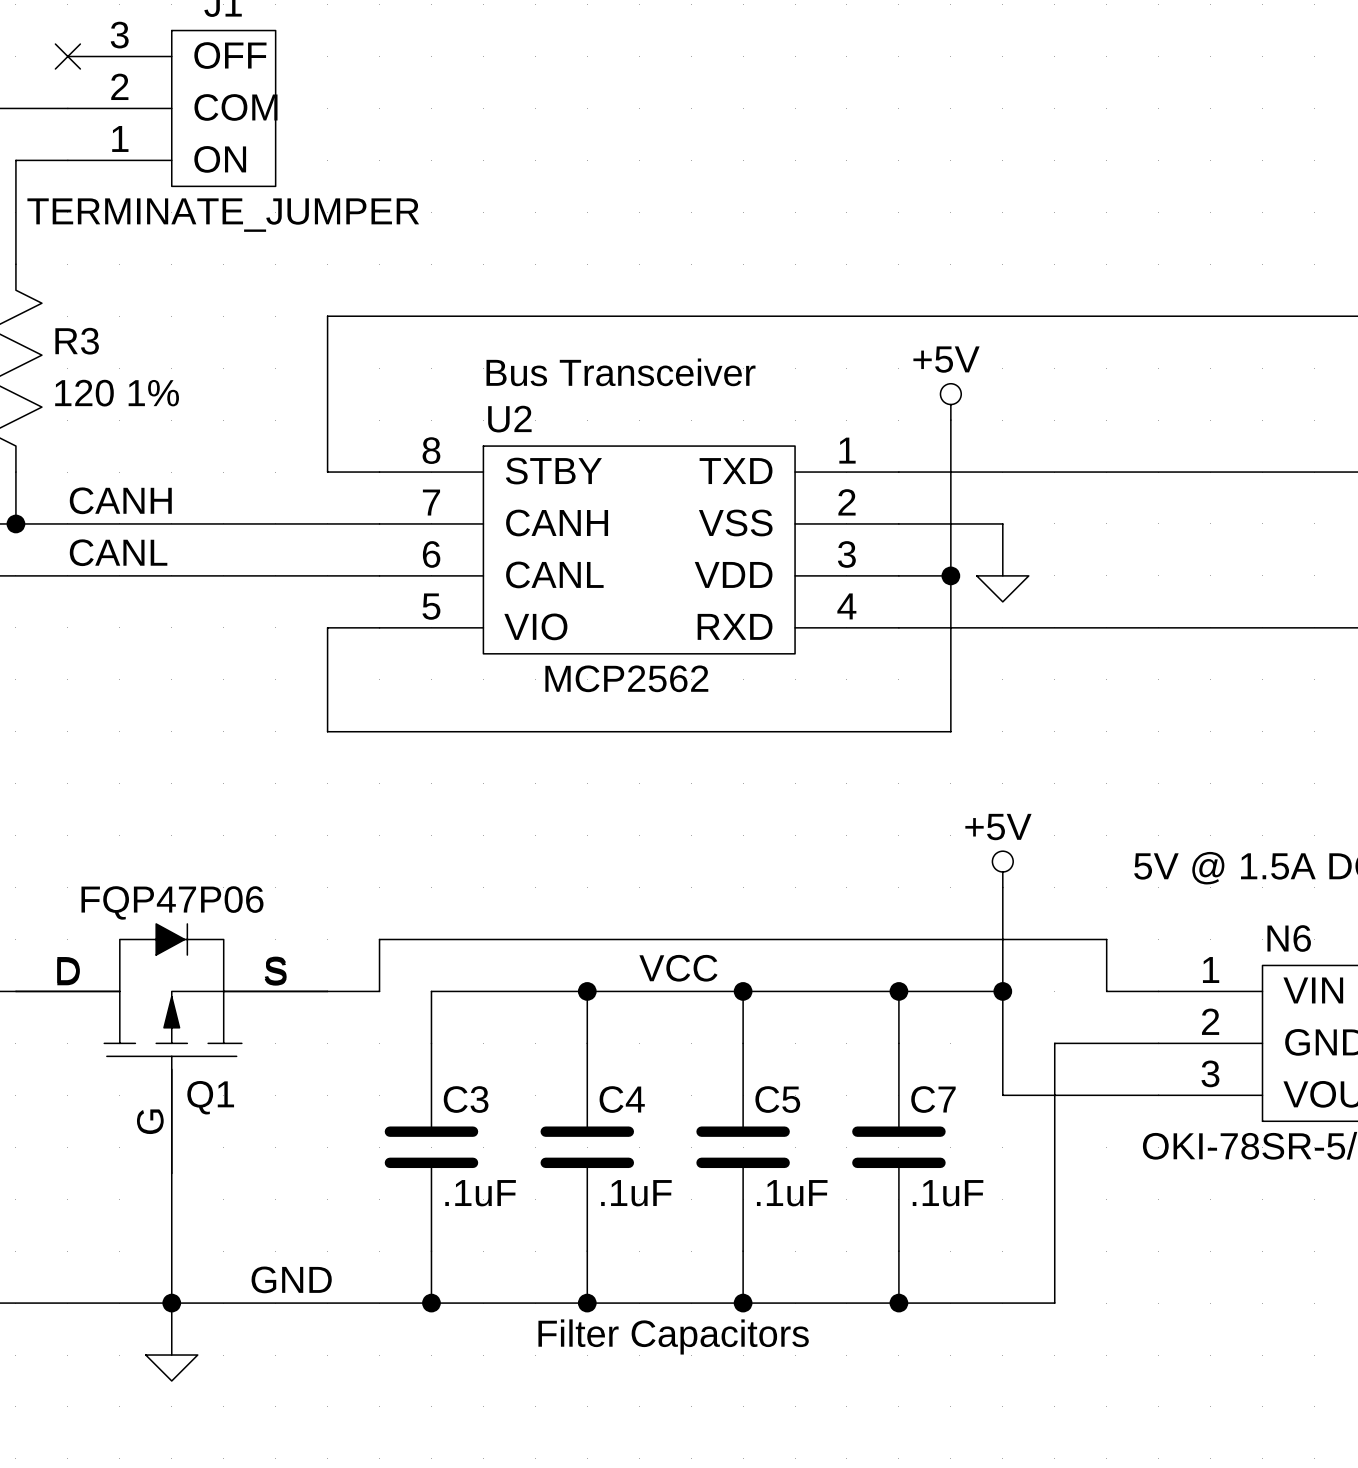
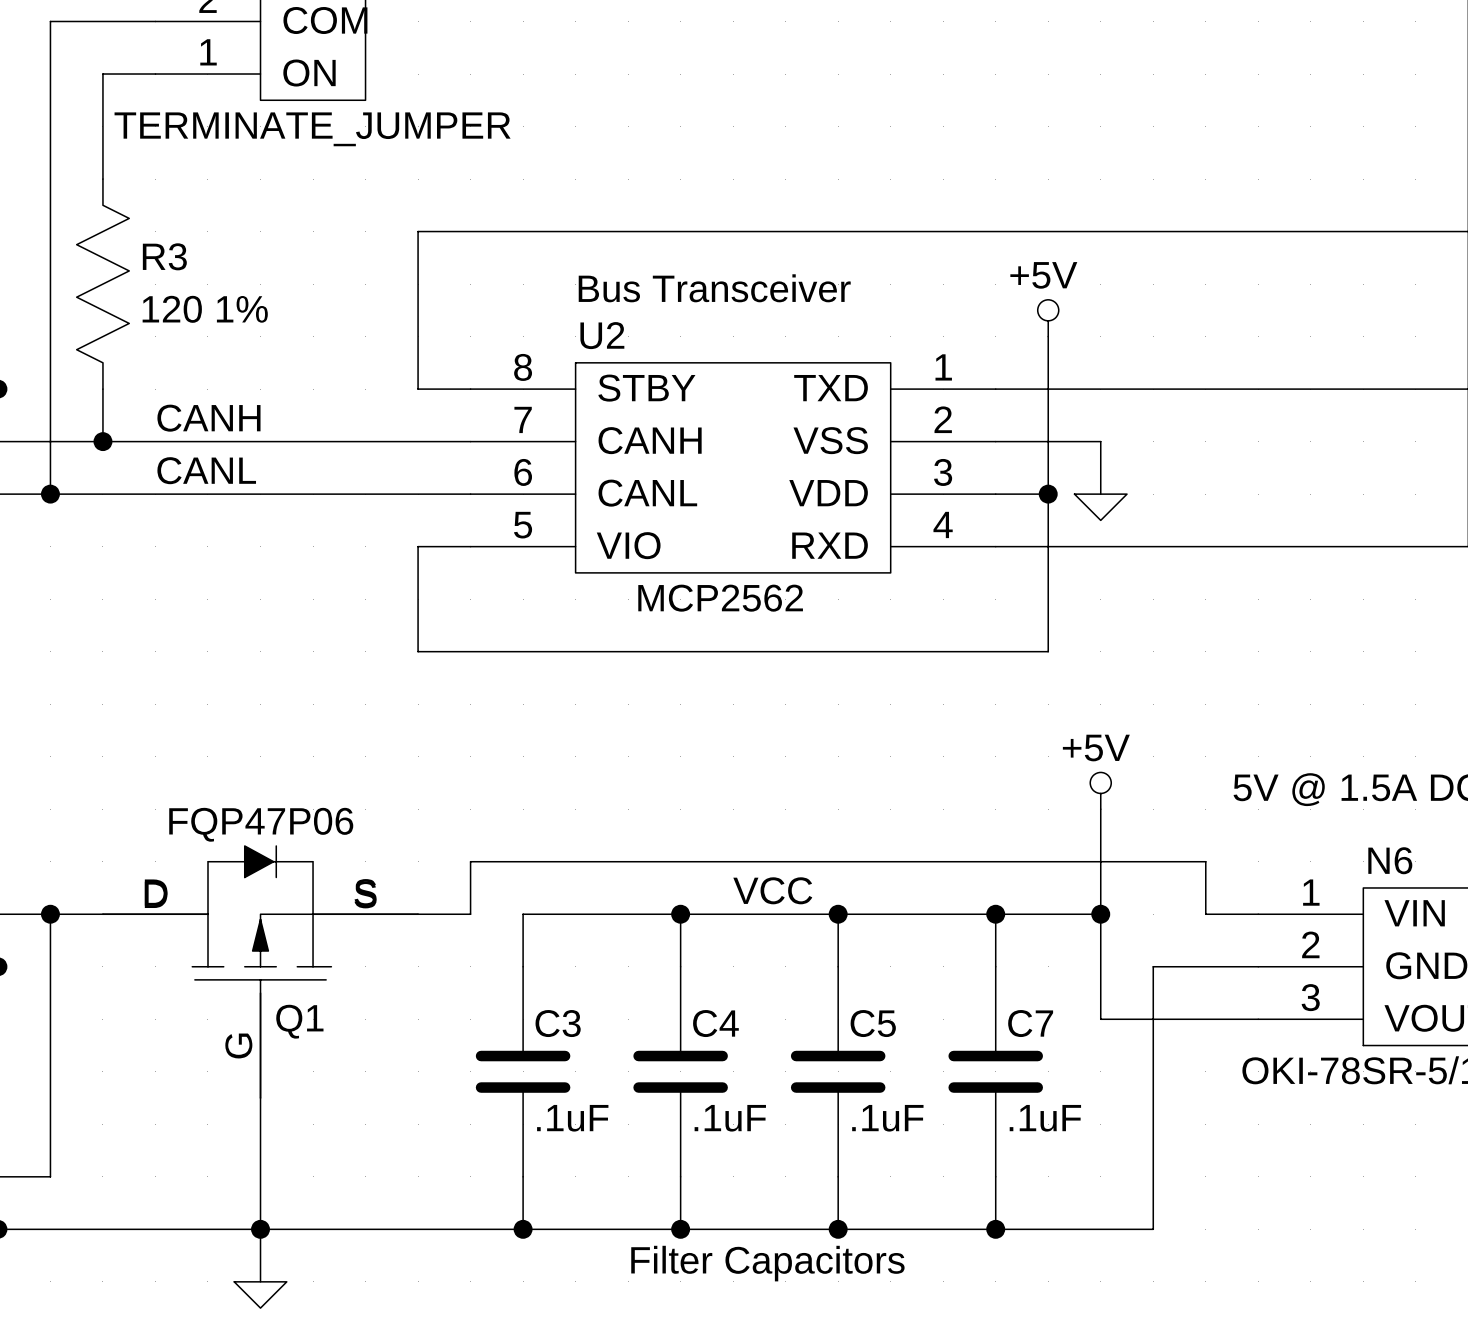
label: GND (291, 1279) -> none

